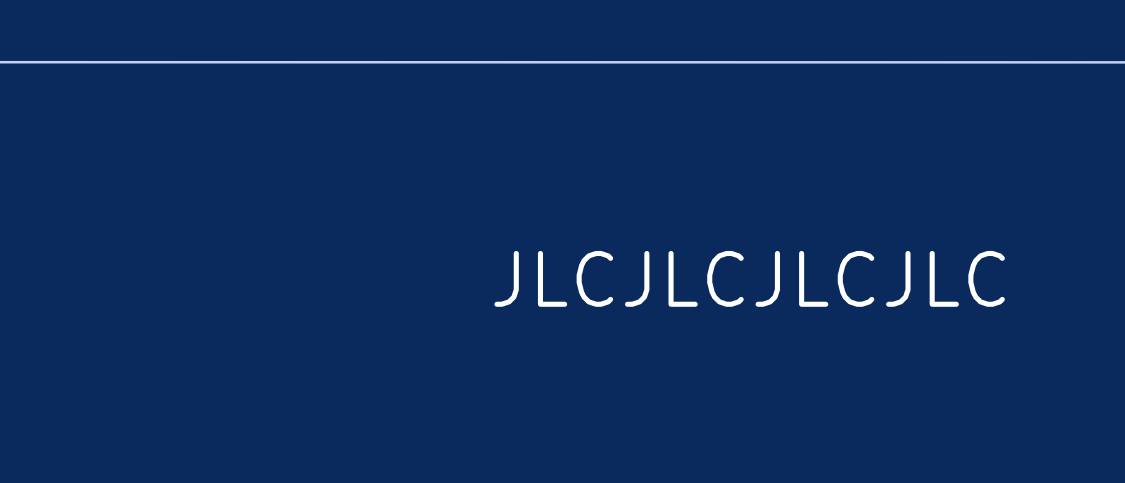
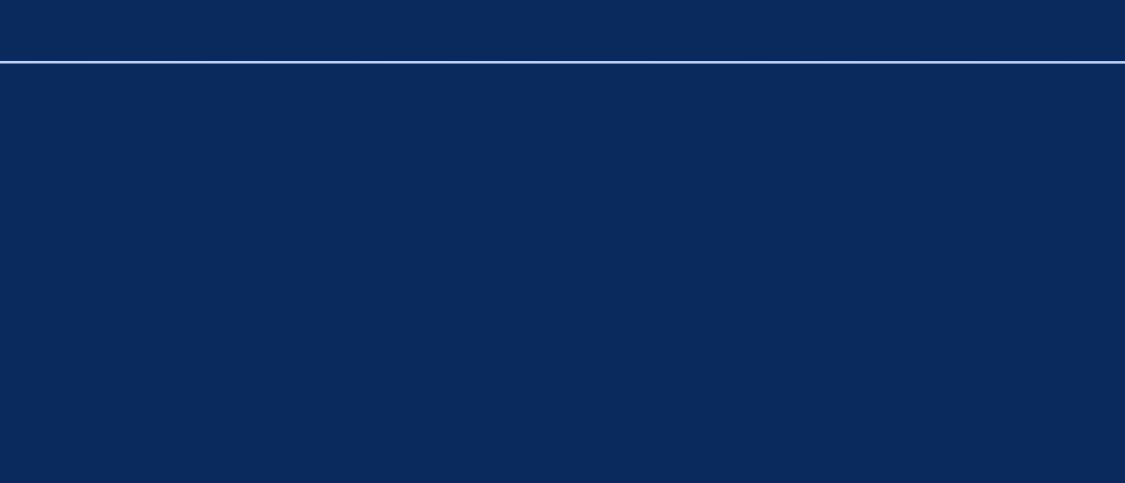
text: JLCJLCJLCJLC (749, 278) -> none

